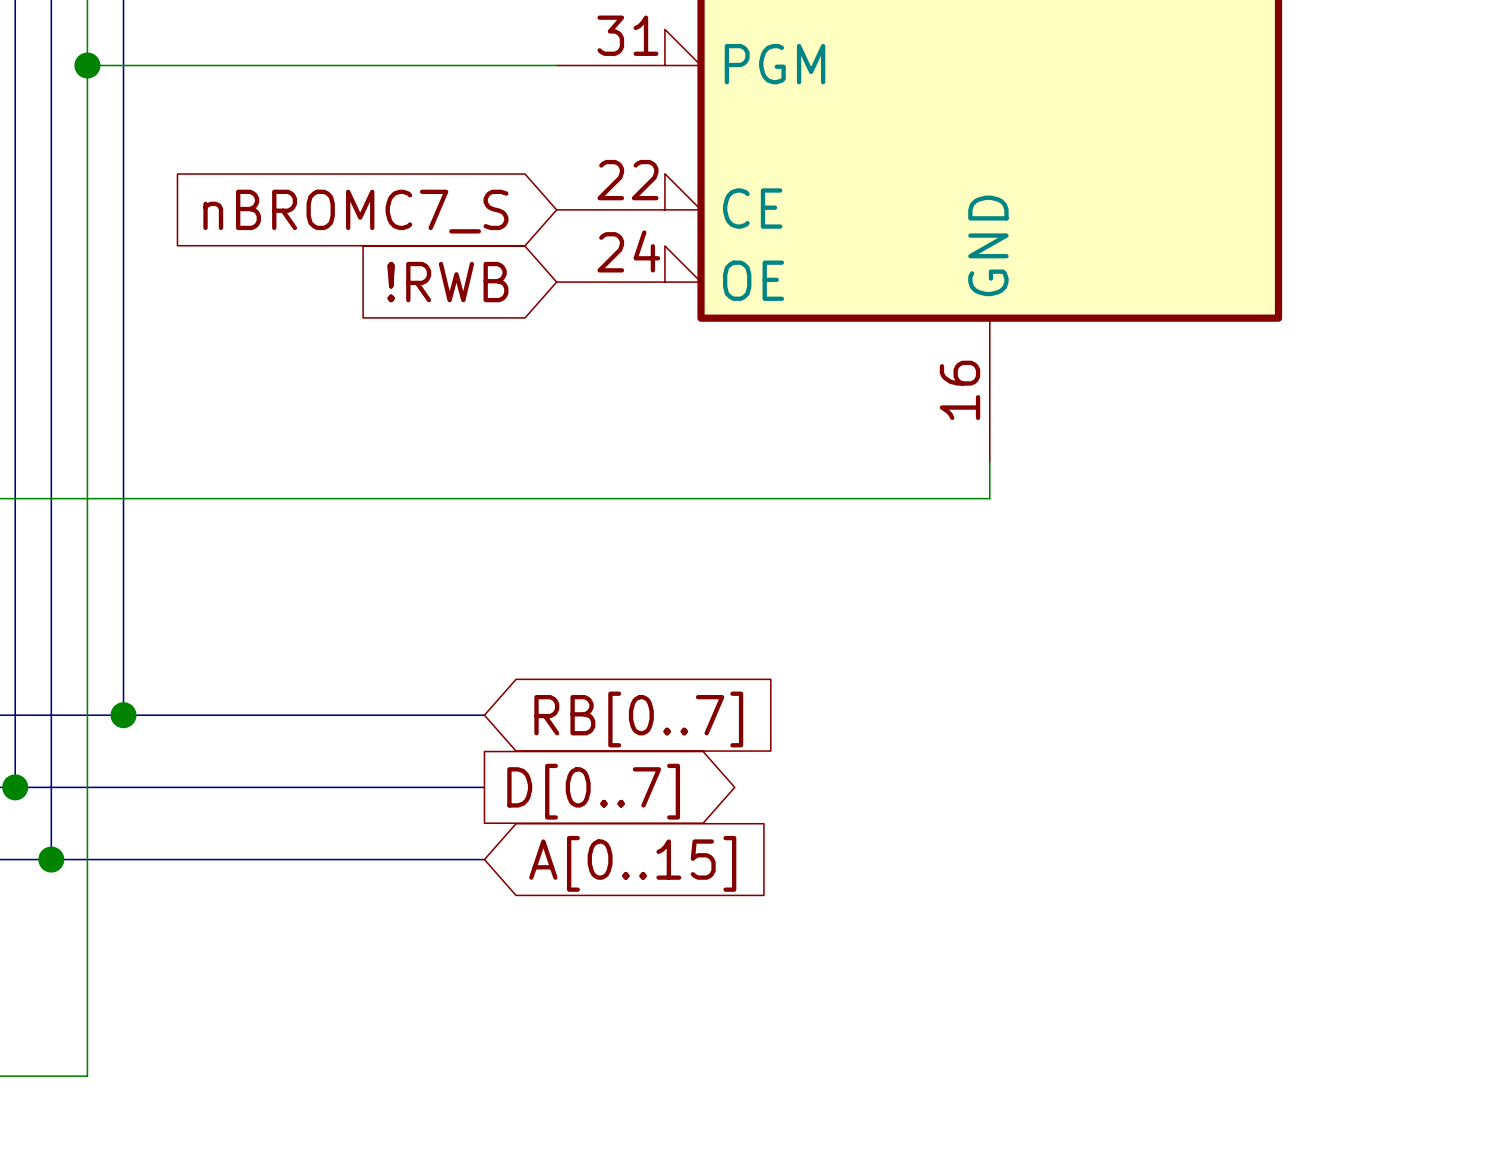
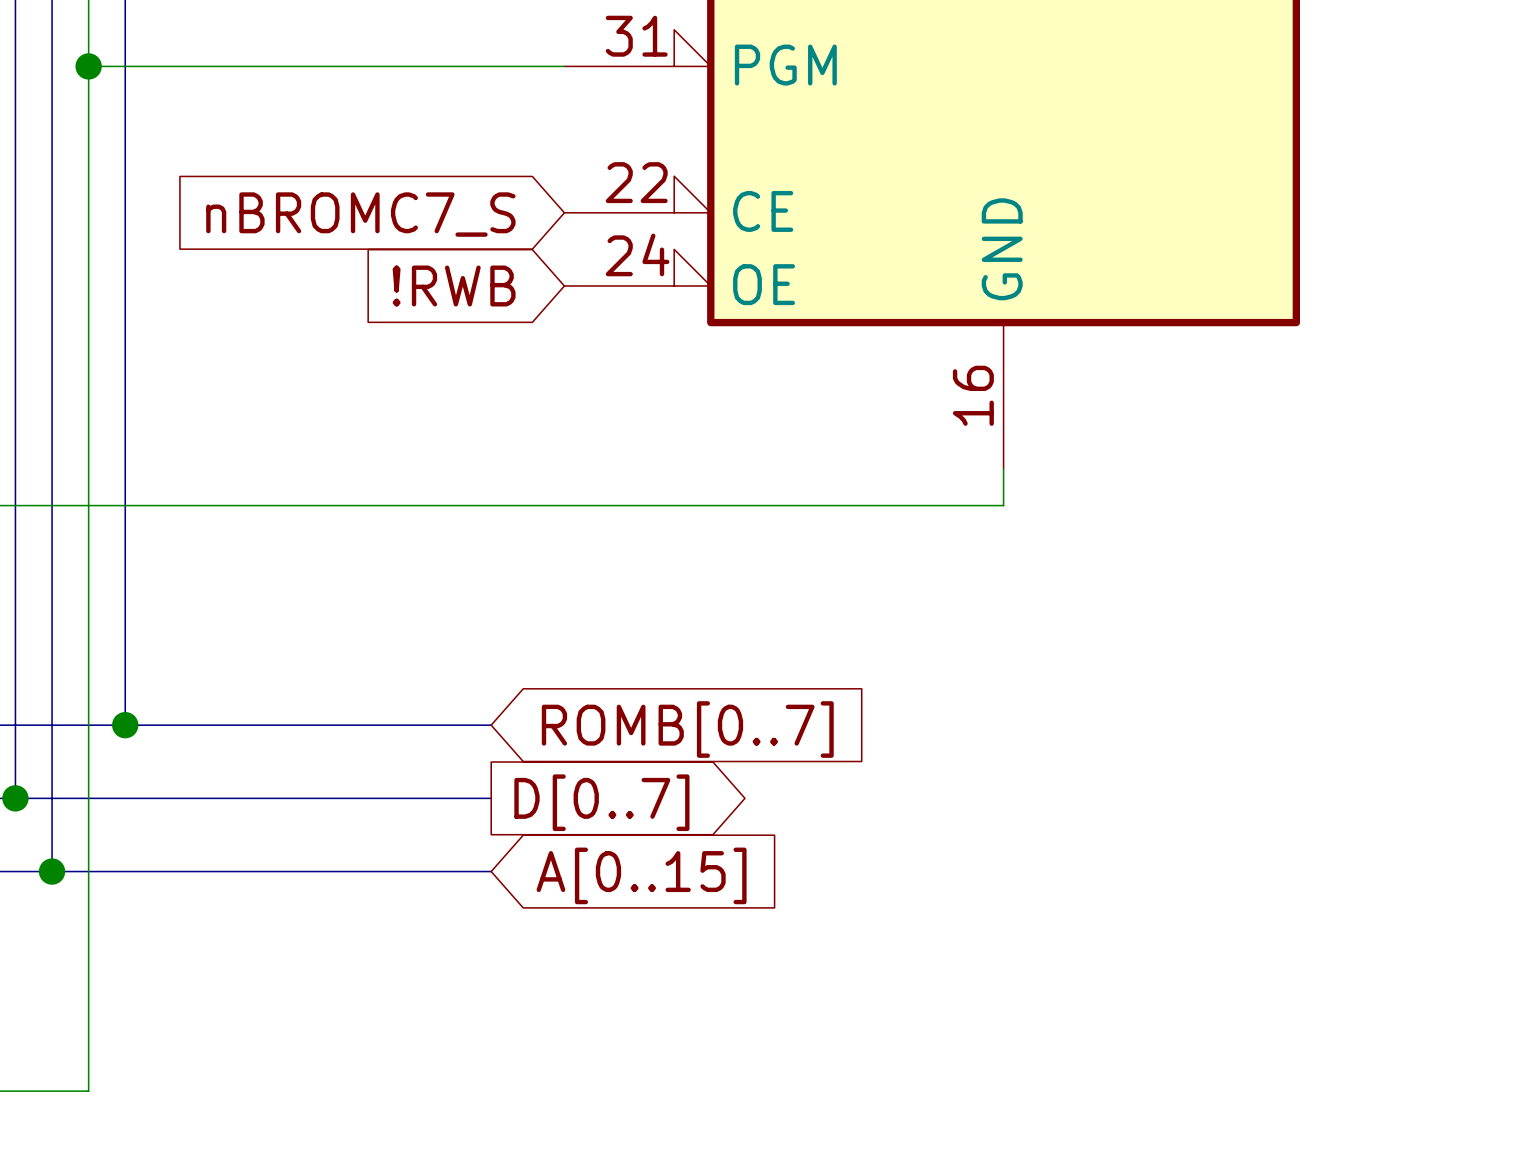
global label: RB[0..7] (638, 719) -> ROMB[0..7] (687, 729)

